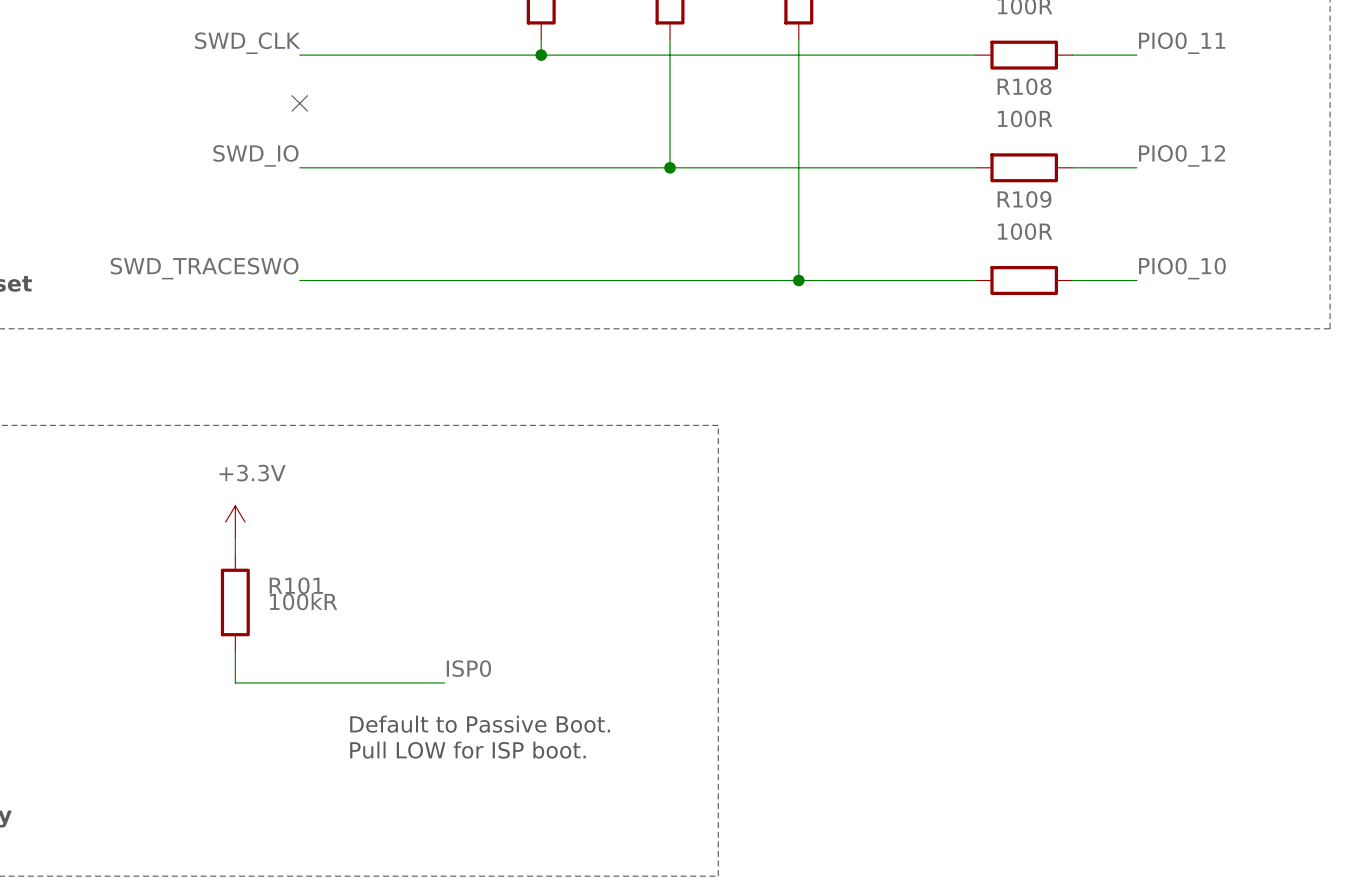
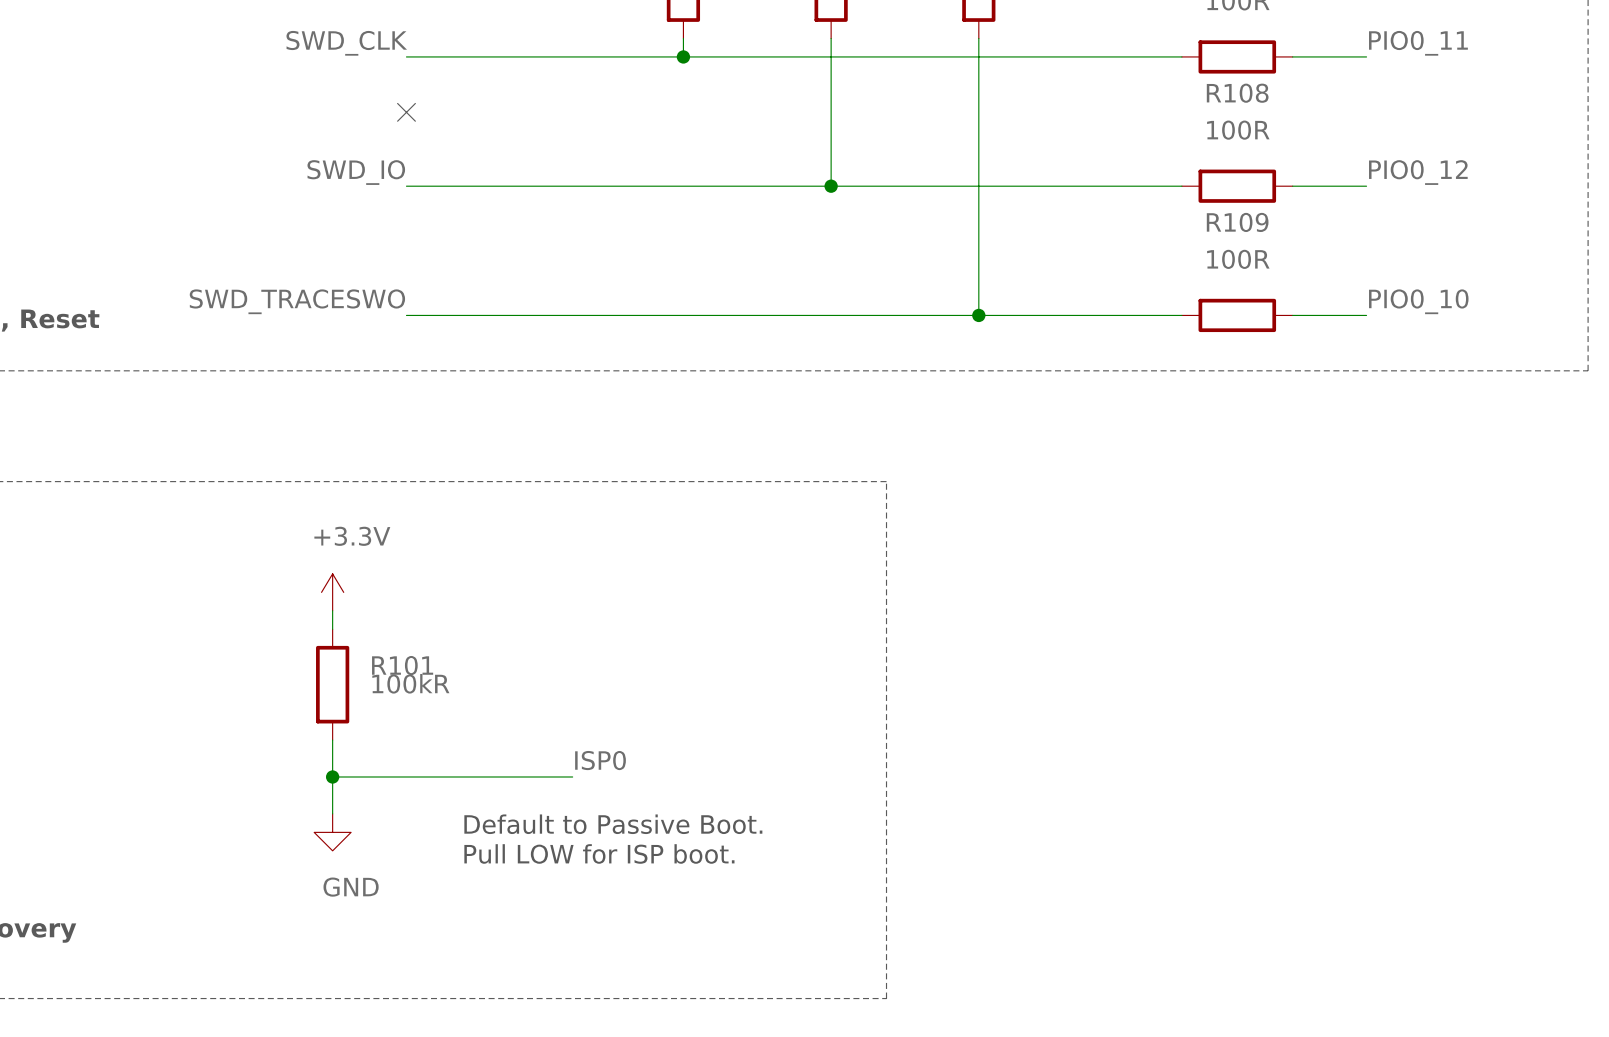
wire: none -> (332, 776) (332, 813)
junction: none -> (332, 776)
power symbol: none -> GND (332, 832)

